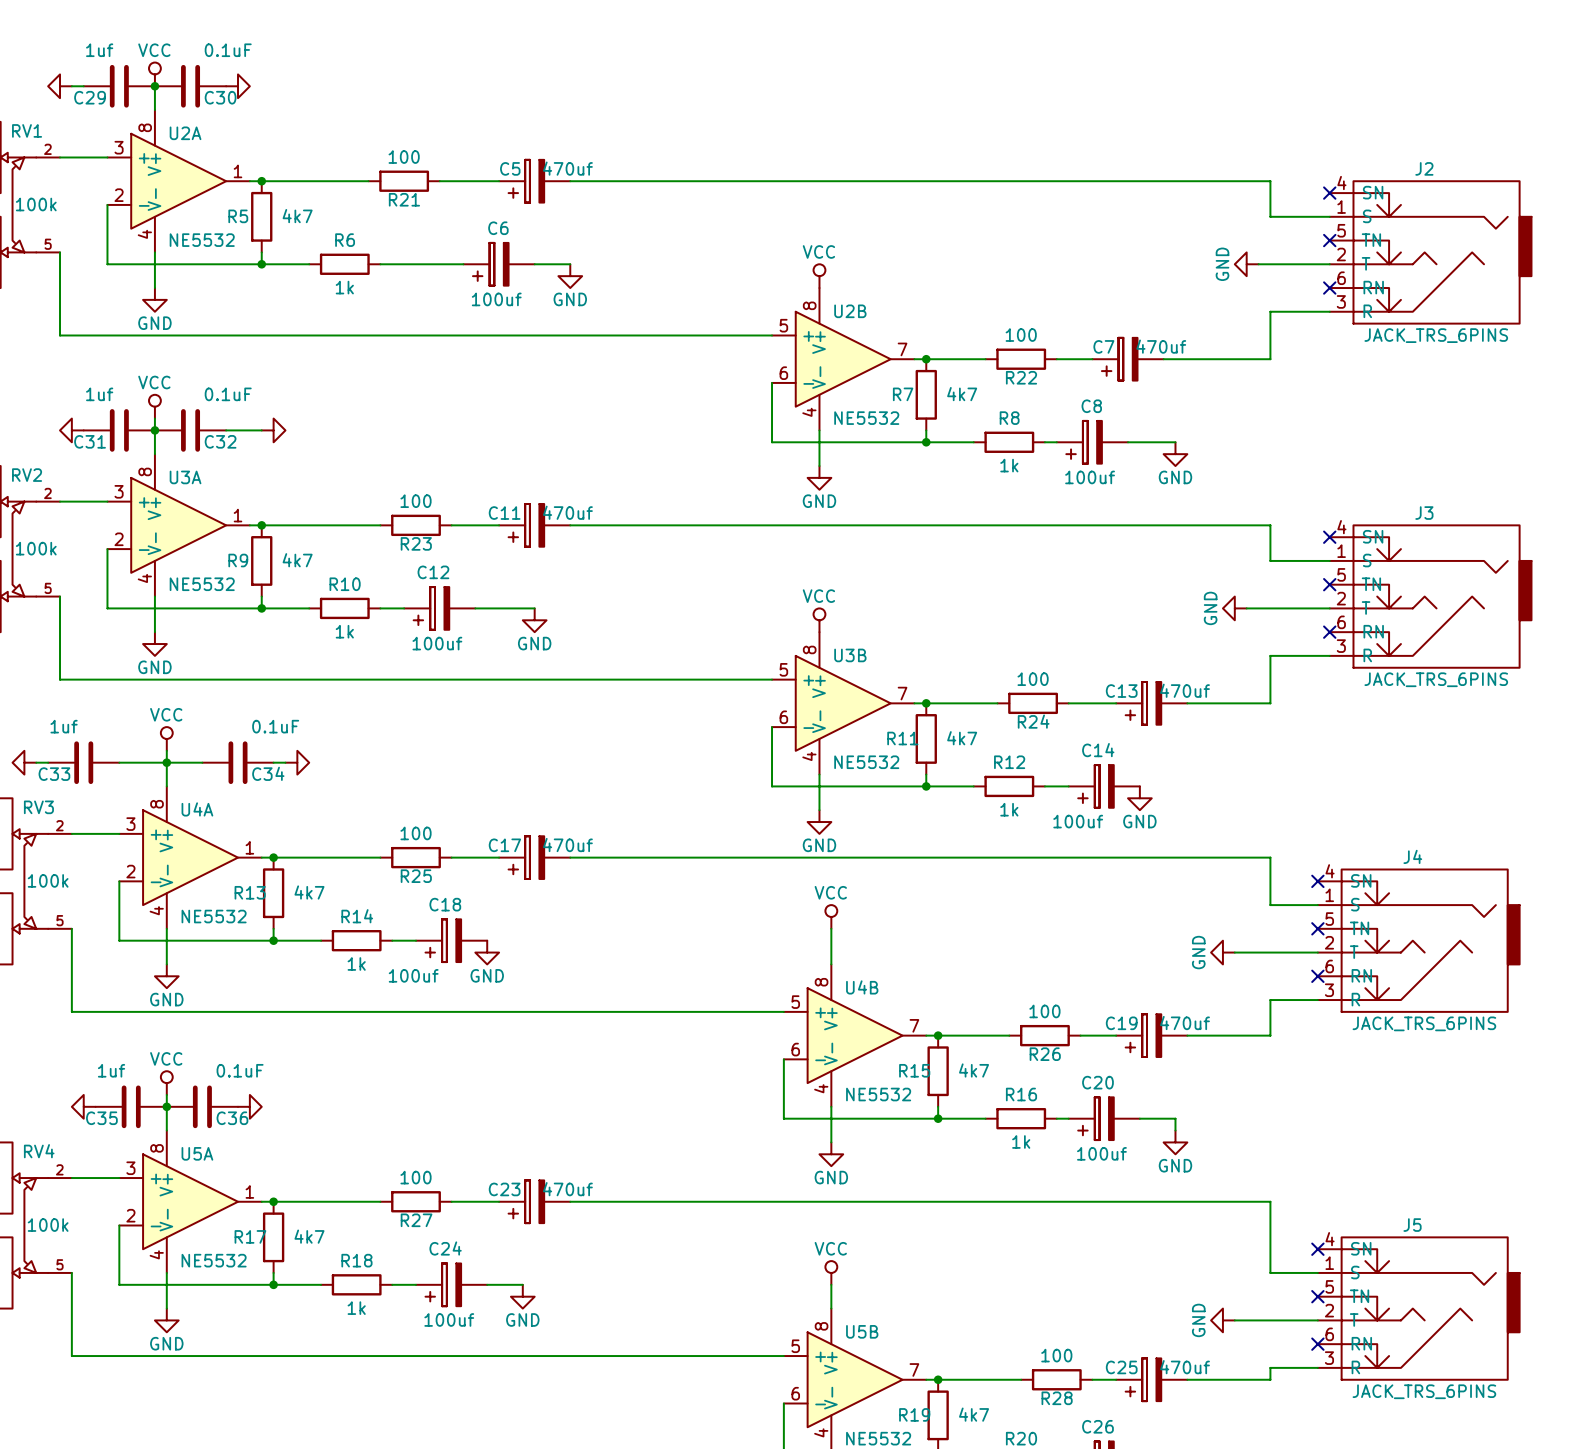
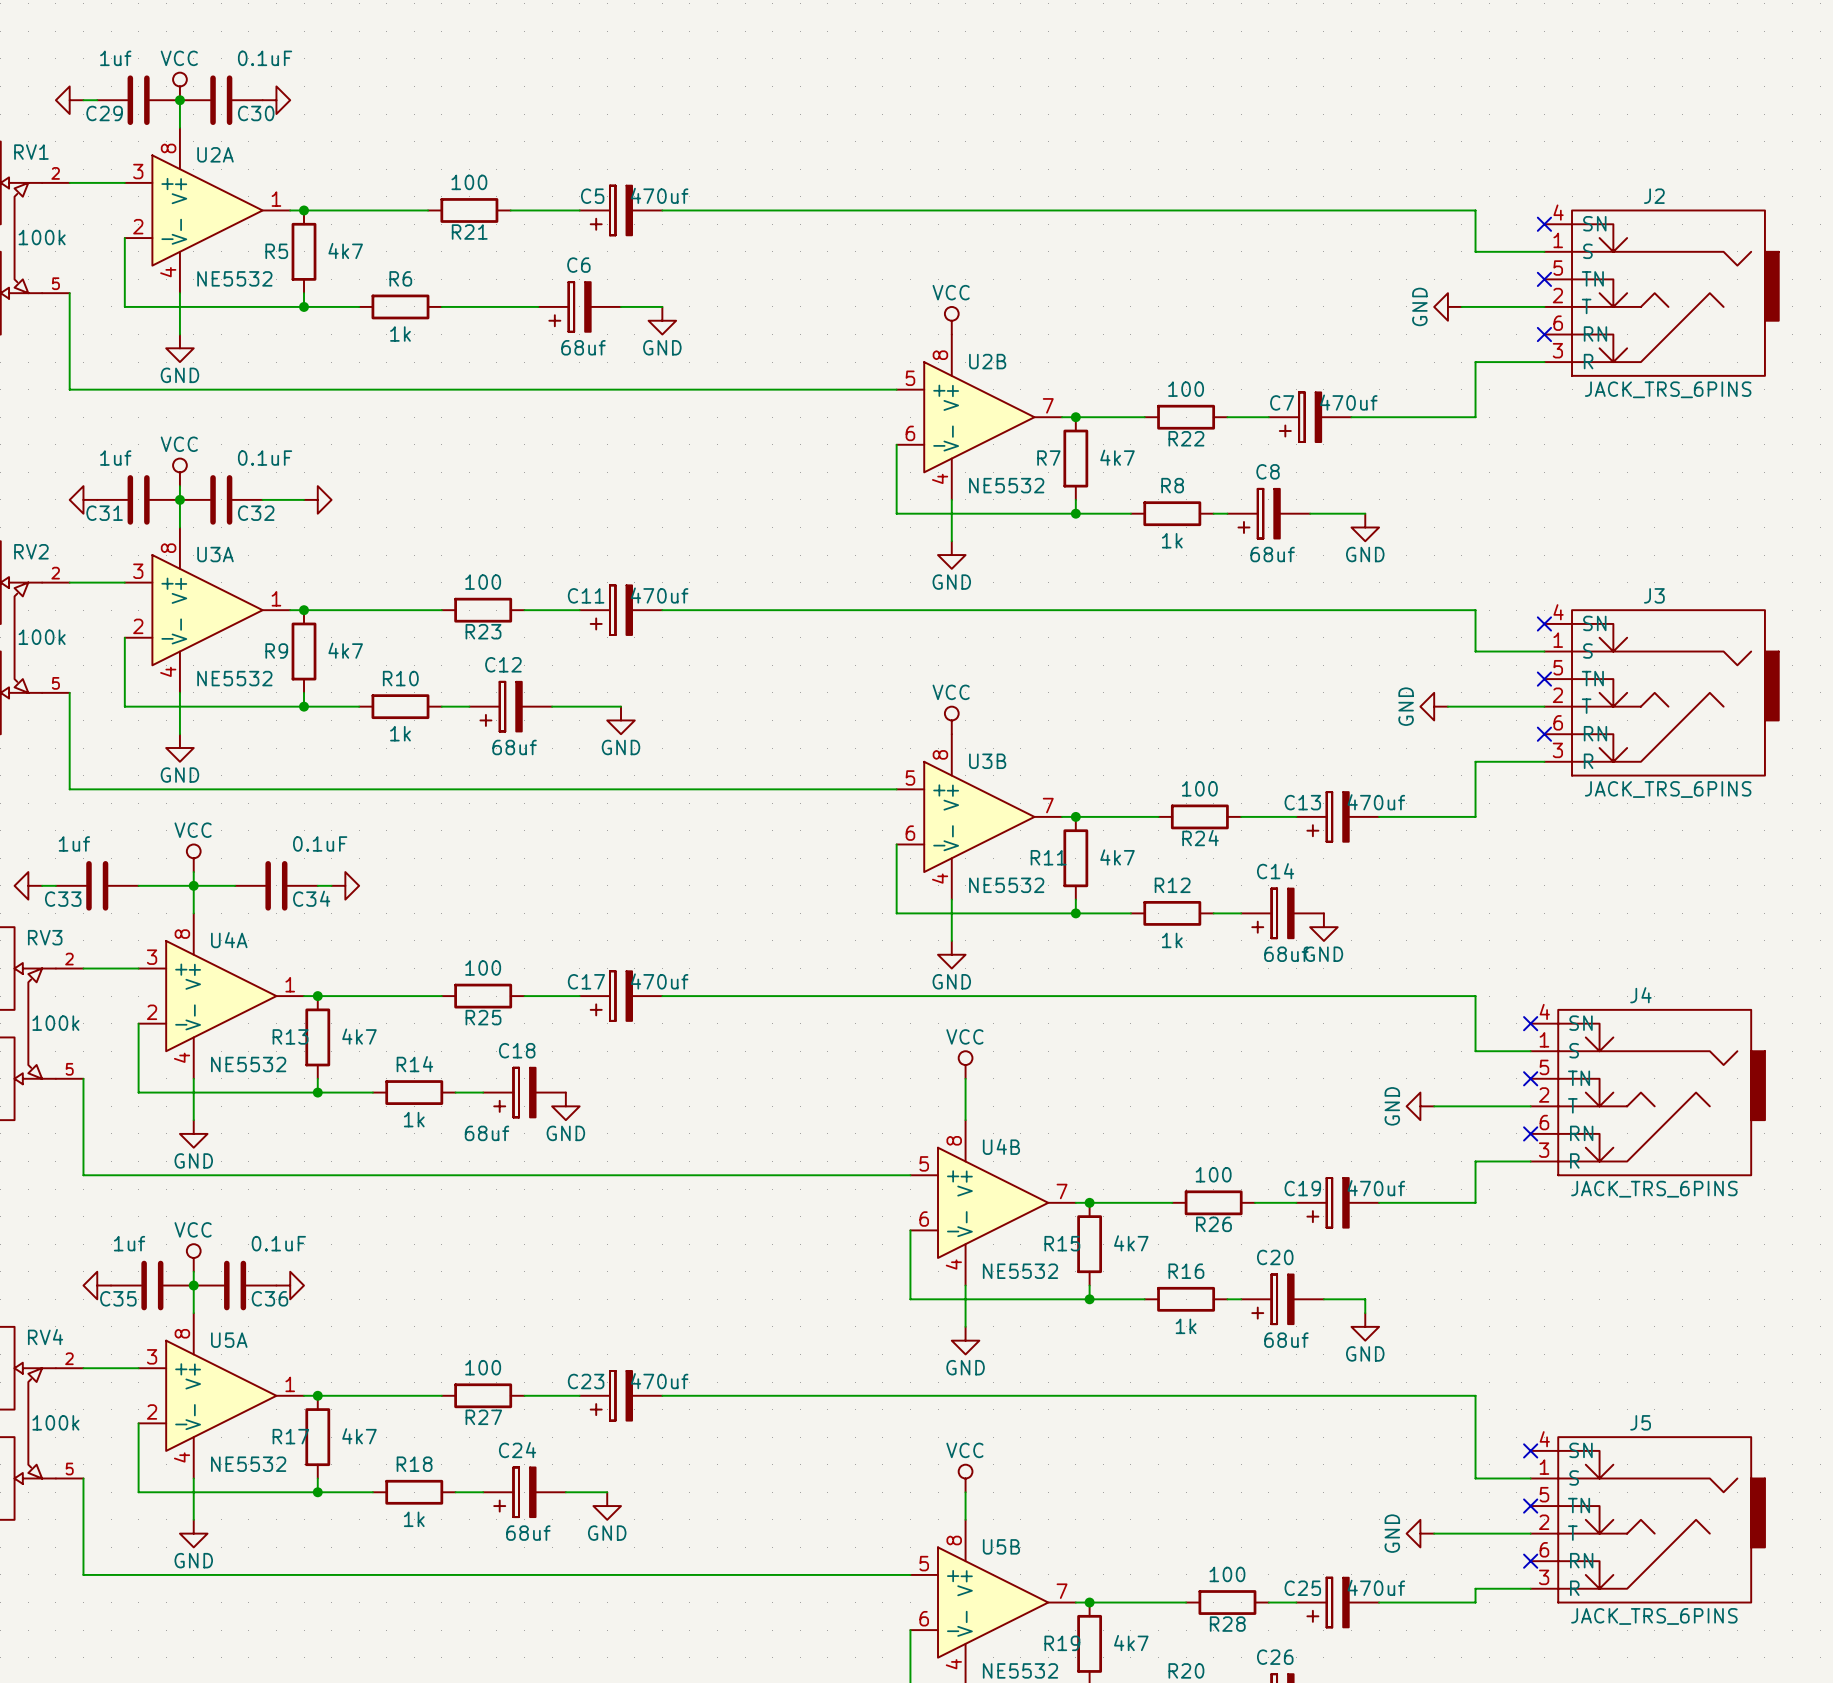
C6 value: 100uf (496, 299) -> 68uf (583, 347)
C8 value: 100uf (1090, 477) -> 68uf (1272, 554)
C12 value: 100uf (437, 643) -> 68uf (514, 747)
C14 value: 100uf (1078, 821) -> 68uf (1286, 954)
C18 value: 100uf (413, 975) -> 68uf (487, 1133)
C20 value: 100uf (1101, 1153) -> 68uf (1286, 1340)
C24 value: 100uf (449, 1319) -> 68uf (528, 1533)

